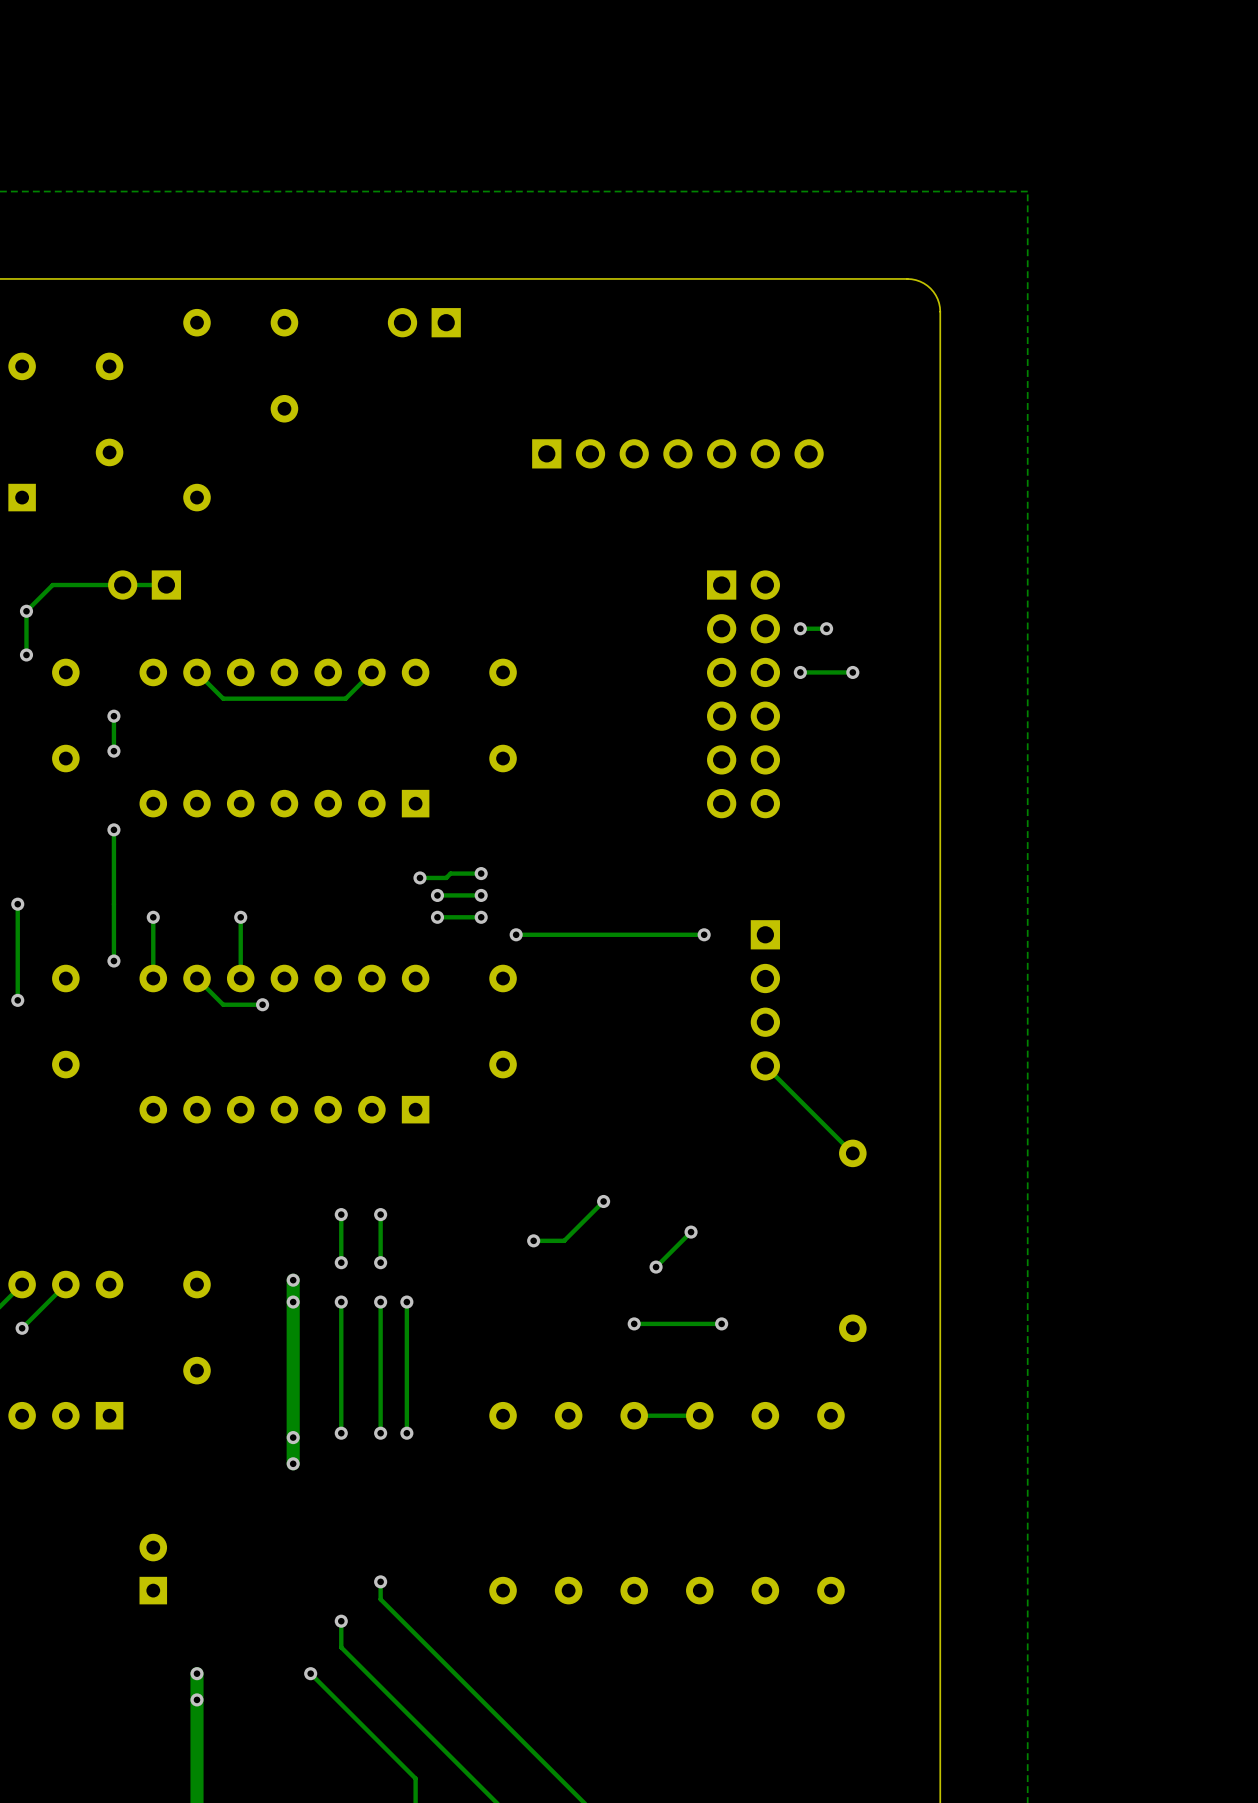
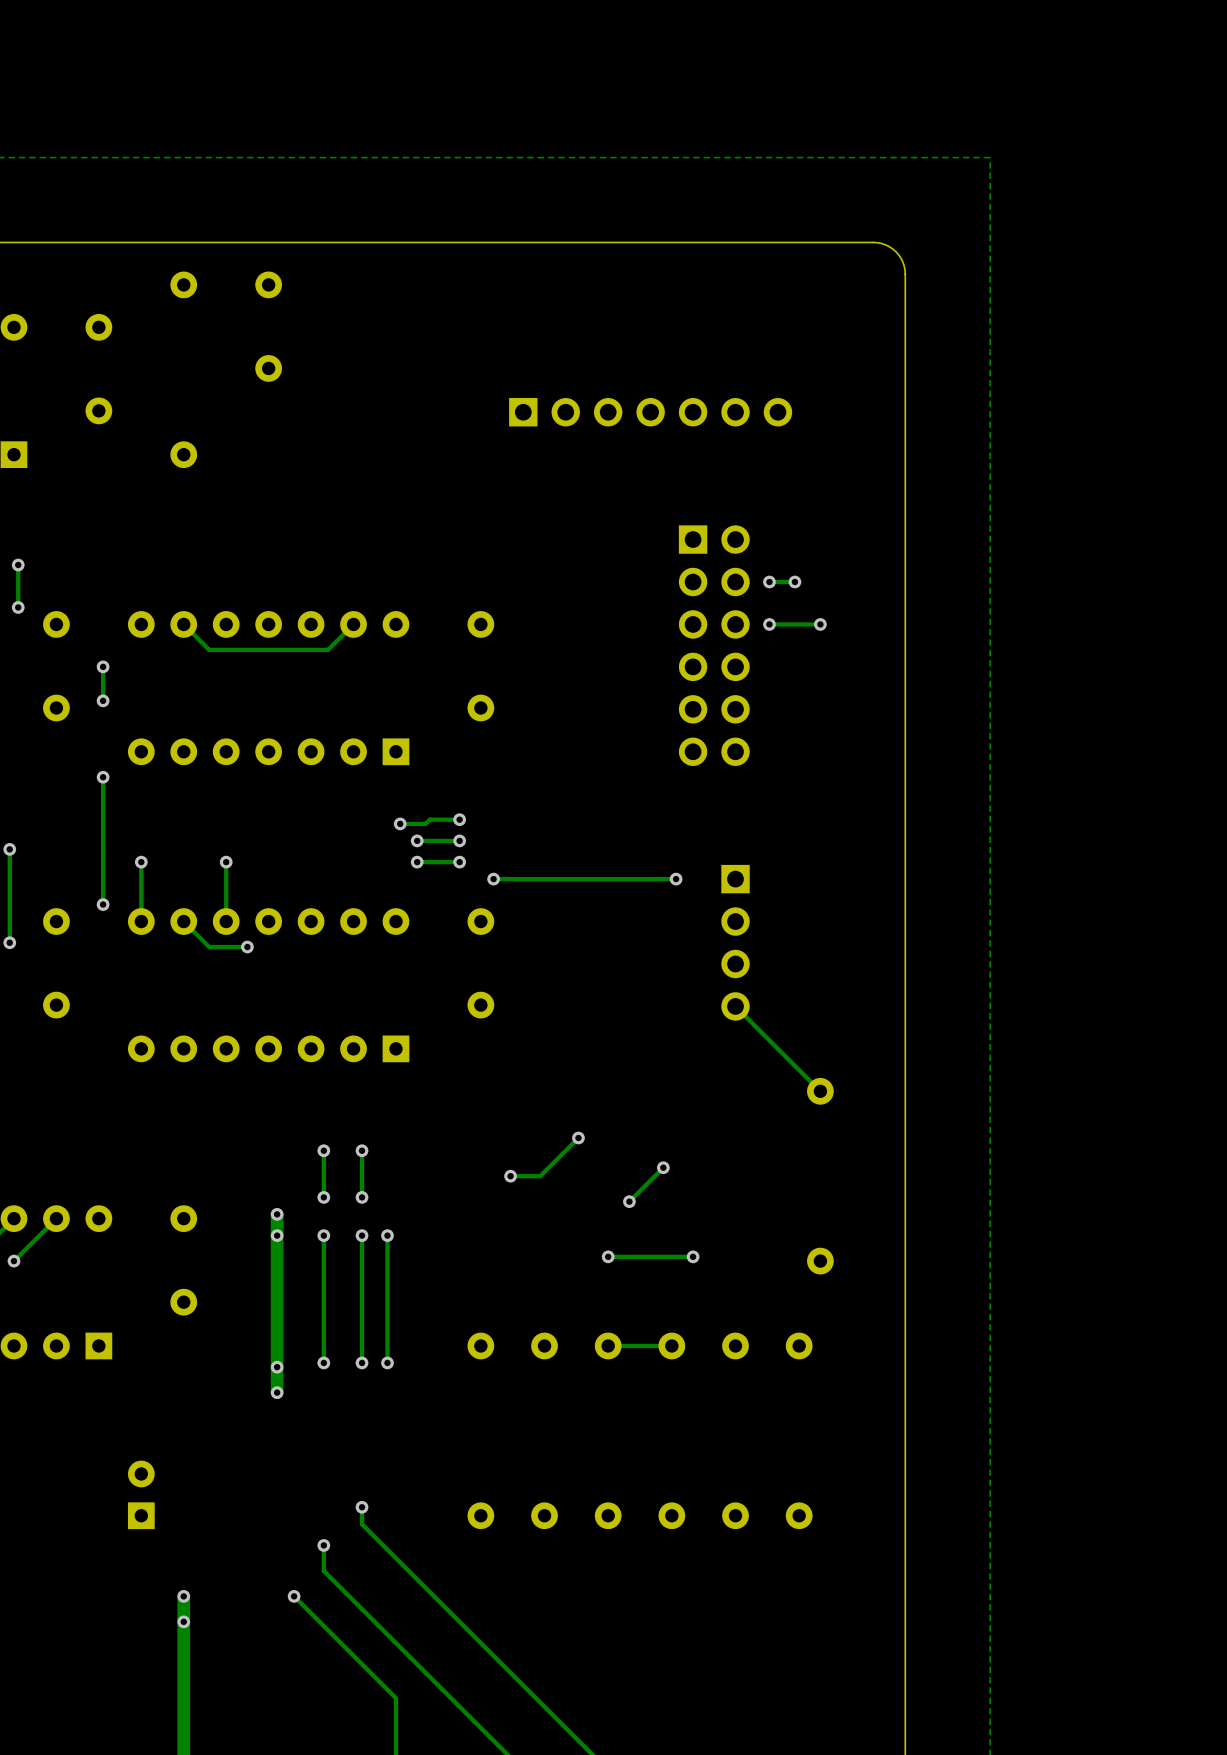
part: (424, 322) -> none
part: (144, 585) -> none
track: (166, 585) (52, 585) (26, 611) -> none

